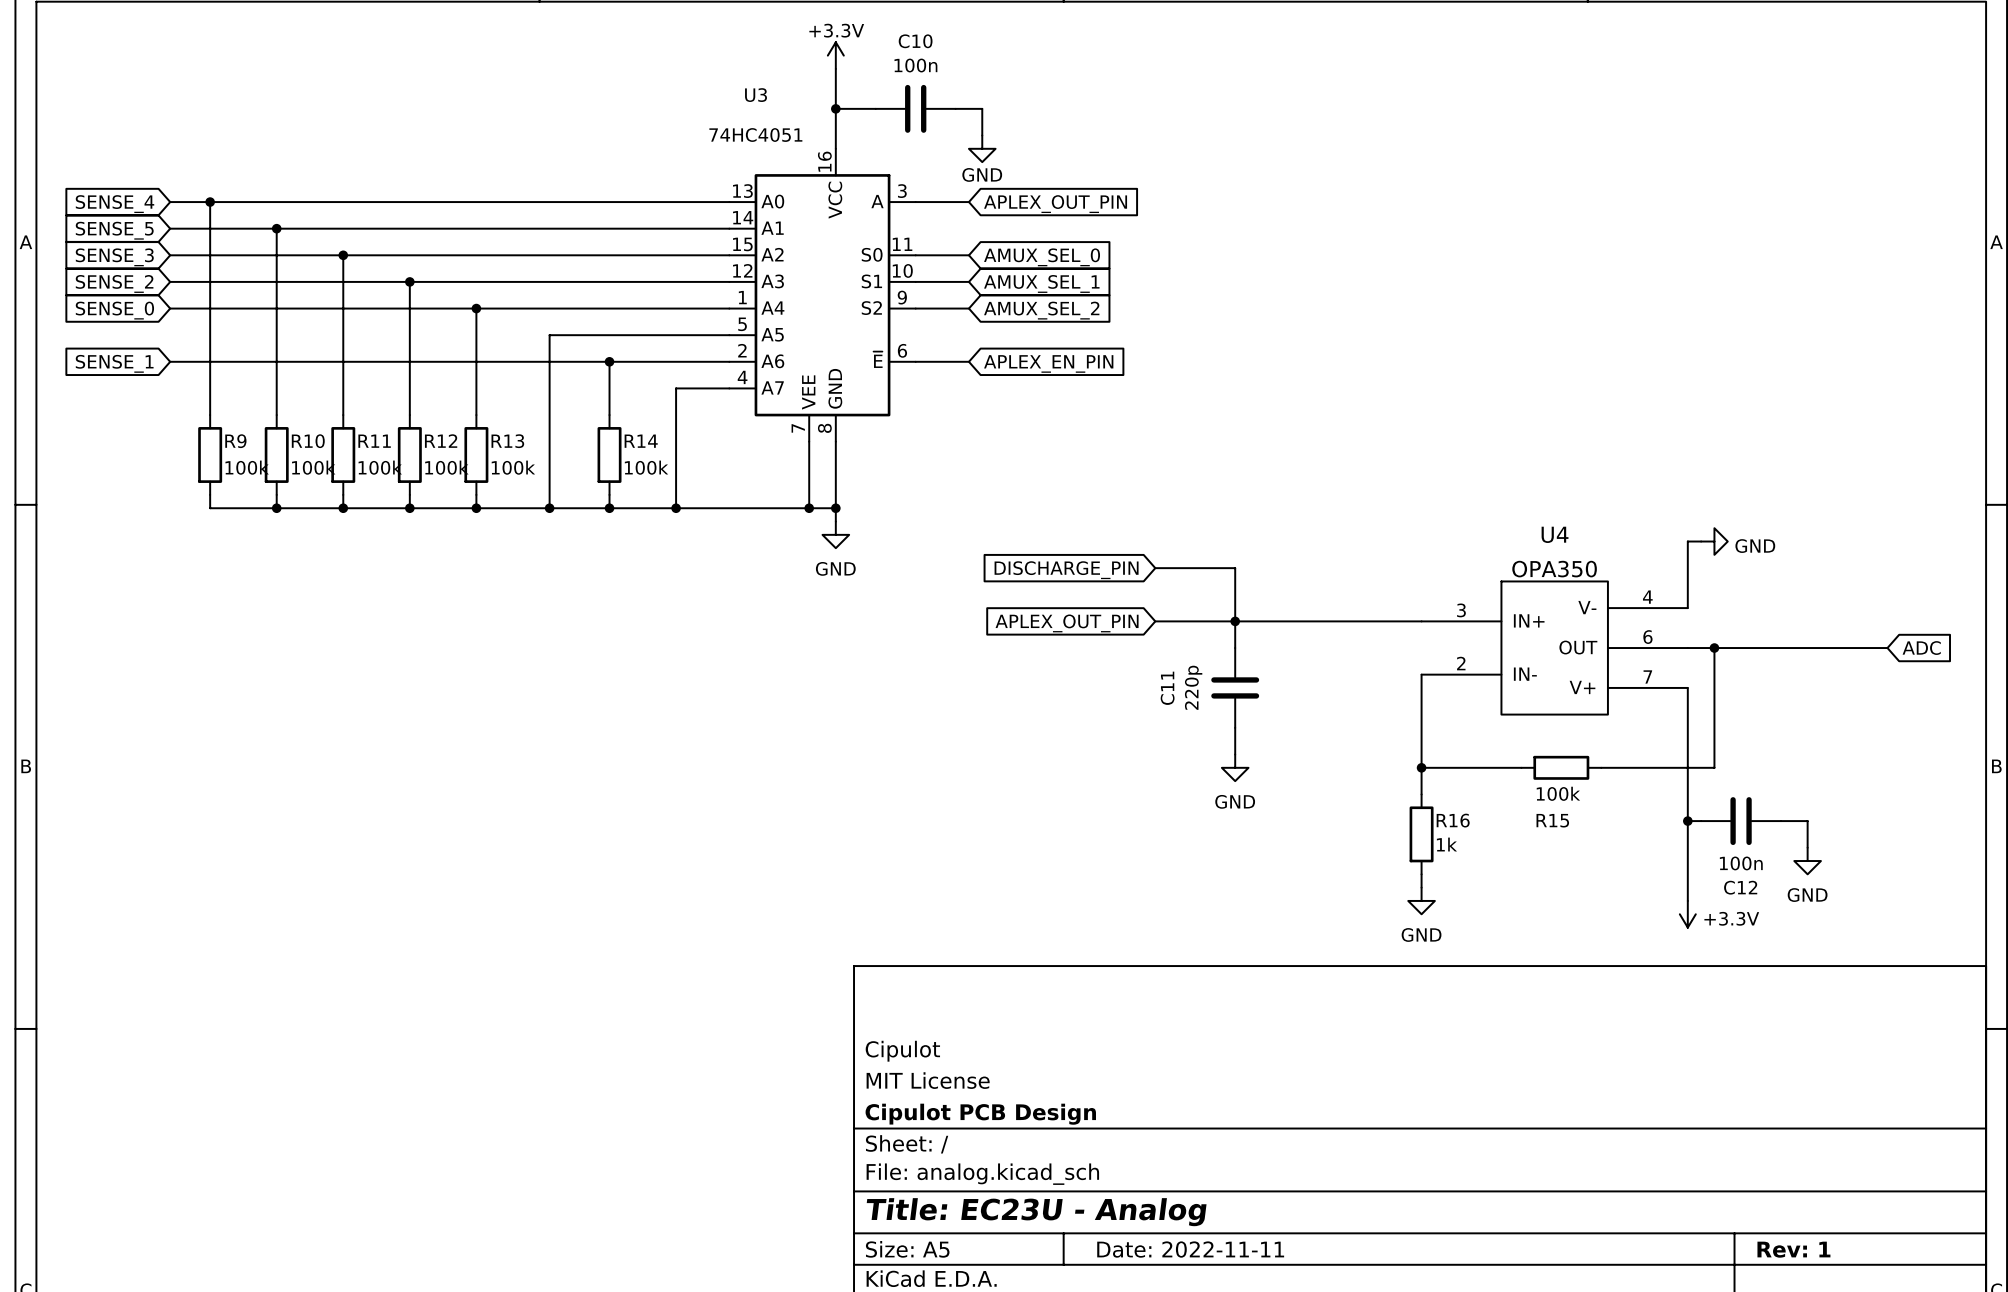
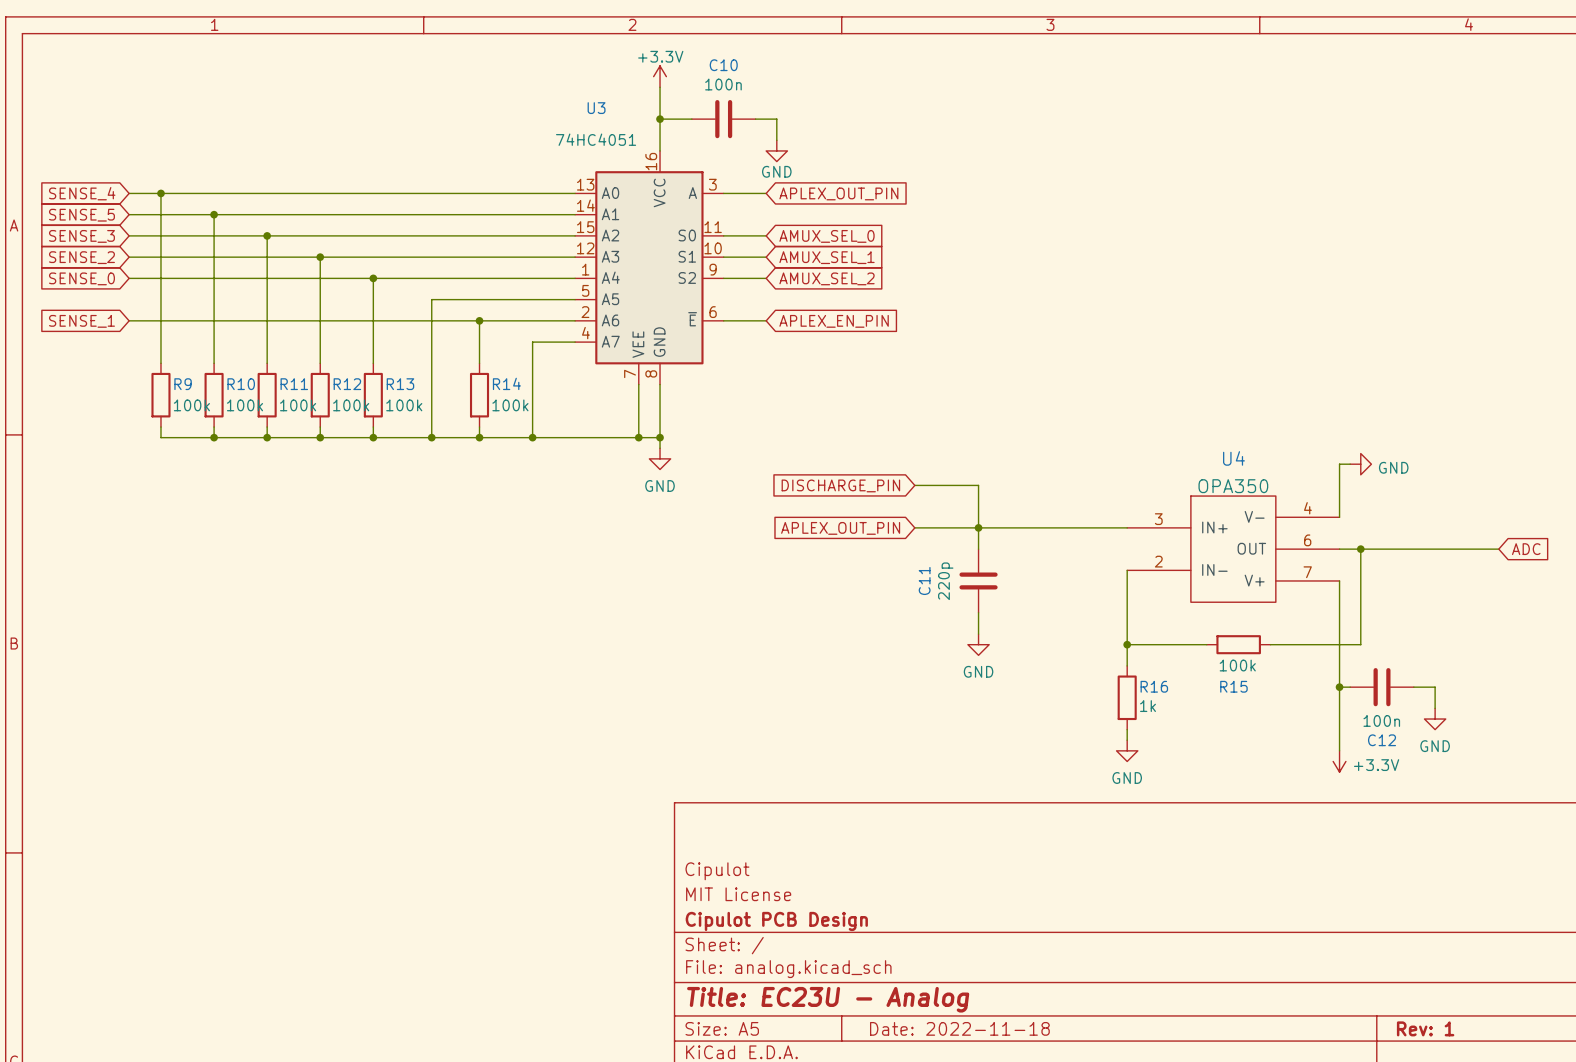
title block: Date: 2022-11-11 (1190, 1249) -> Date: 2022-11-18 (959, 1028)

